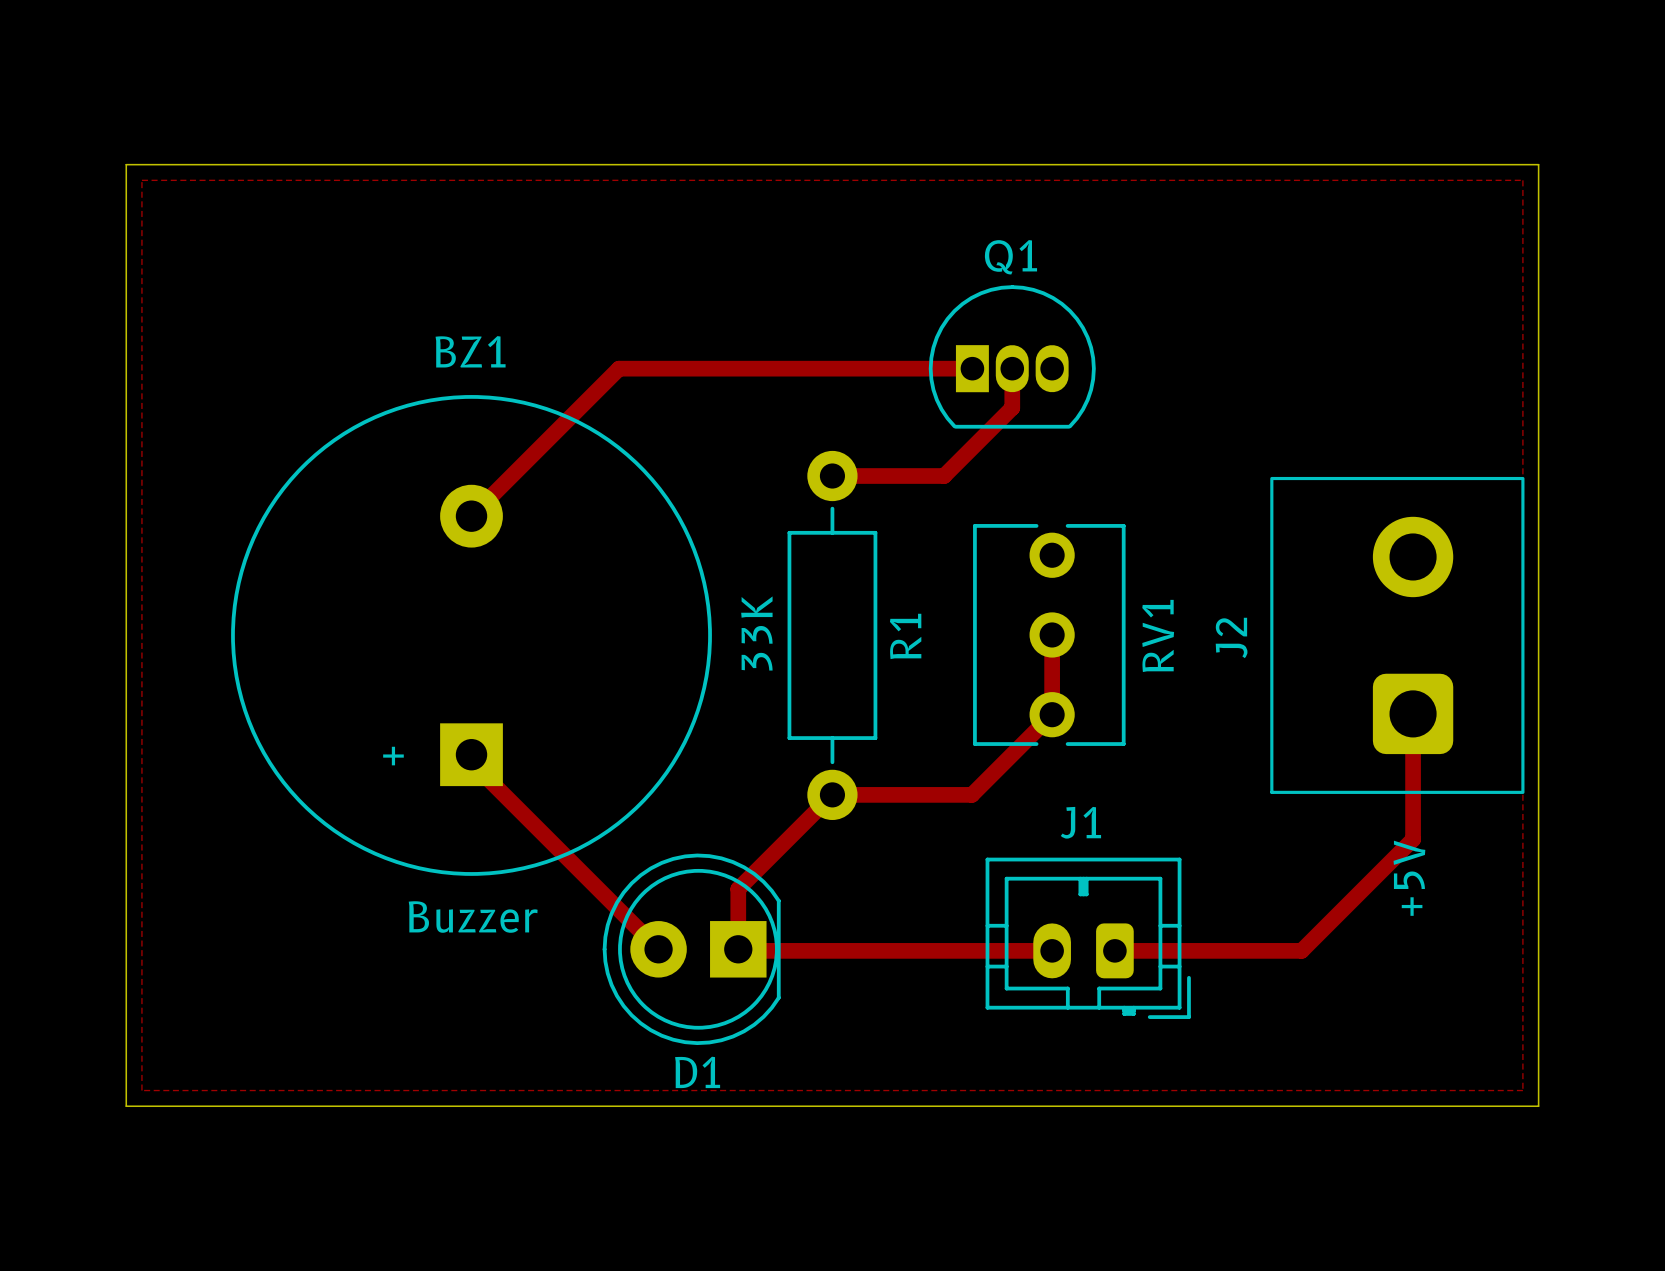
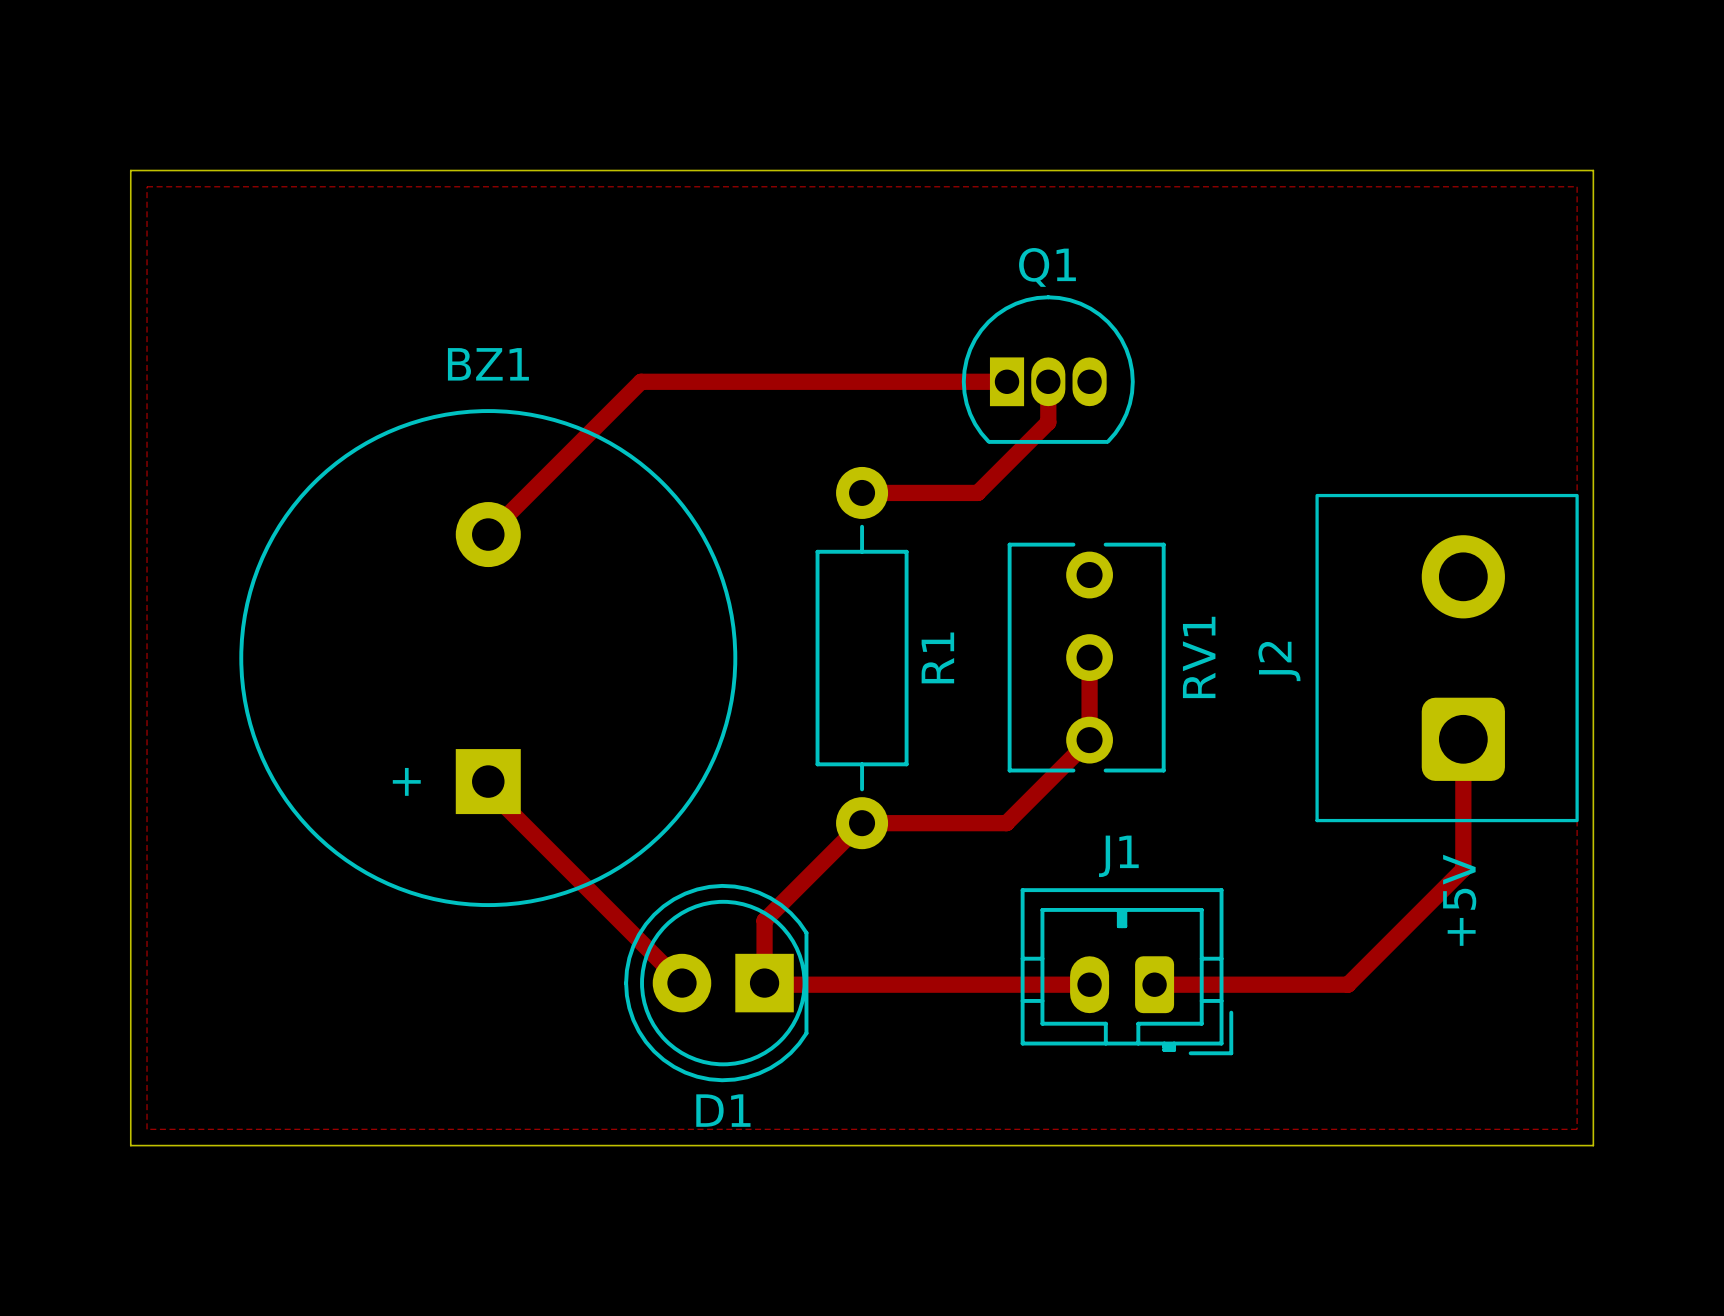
R1 value: 33K (756, 633) -> none
BZ1 value: Buzzer (473, 917) -> none

